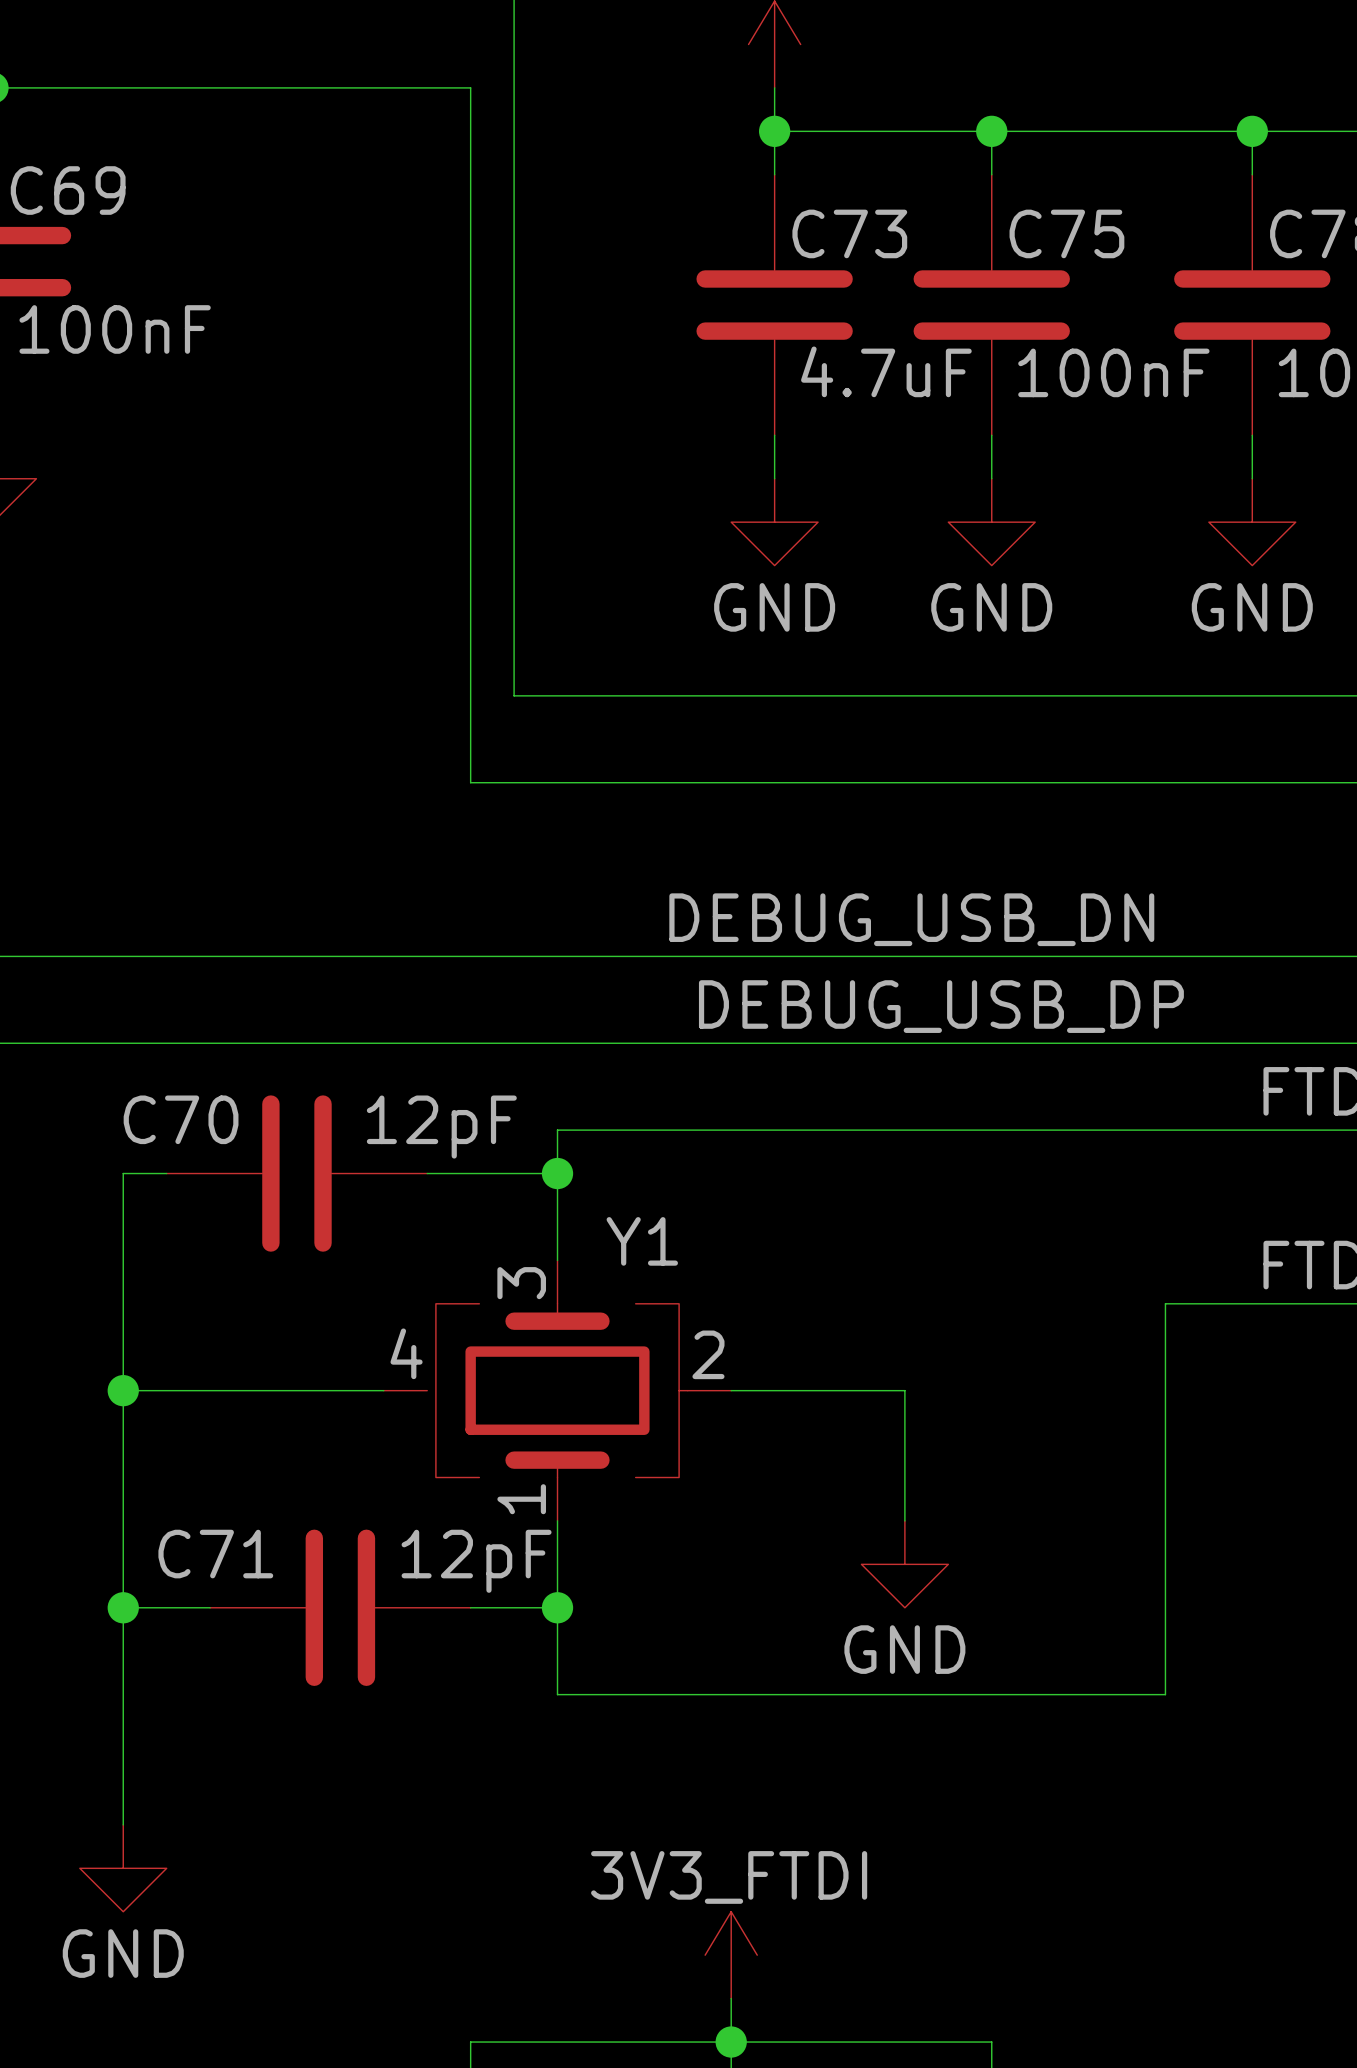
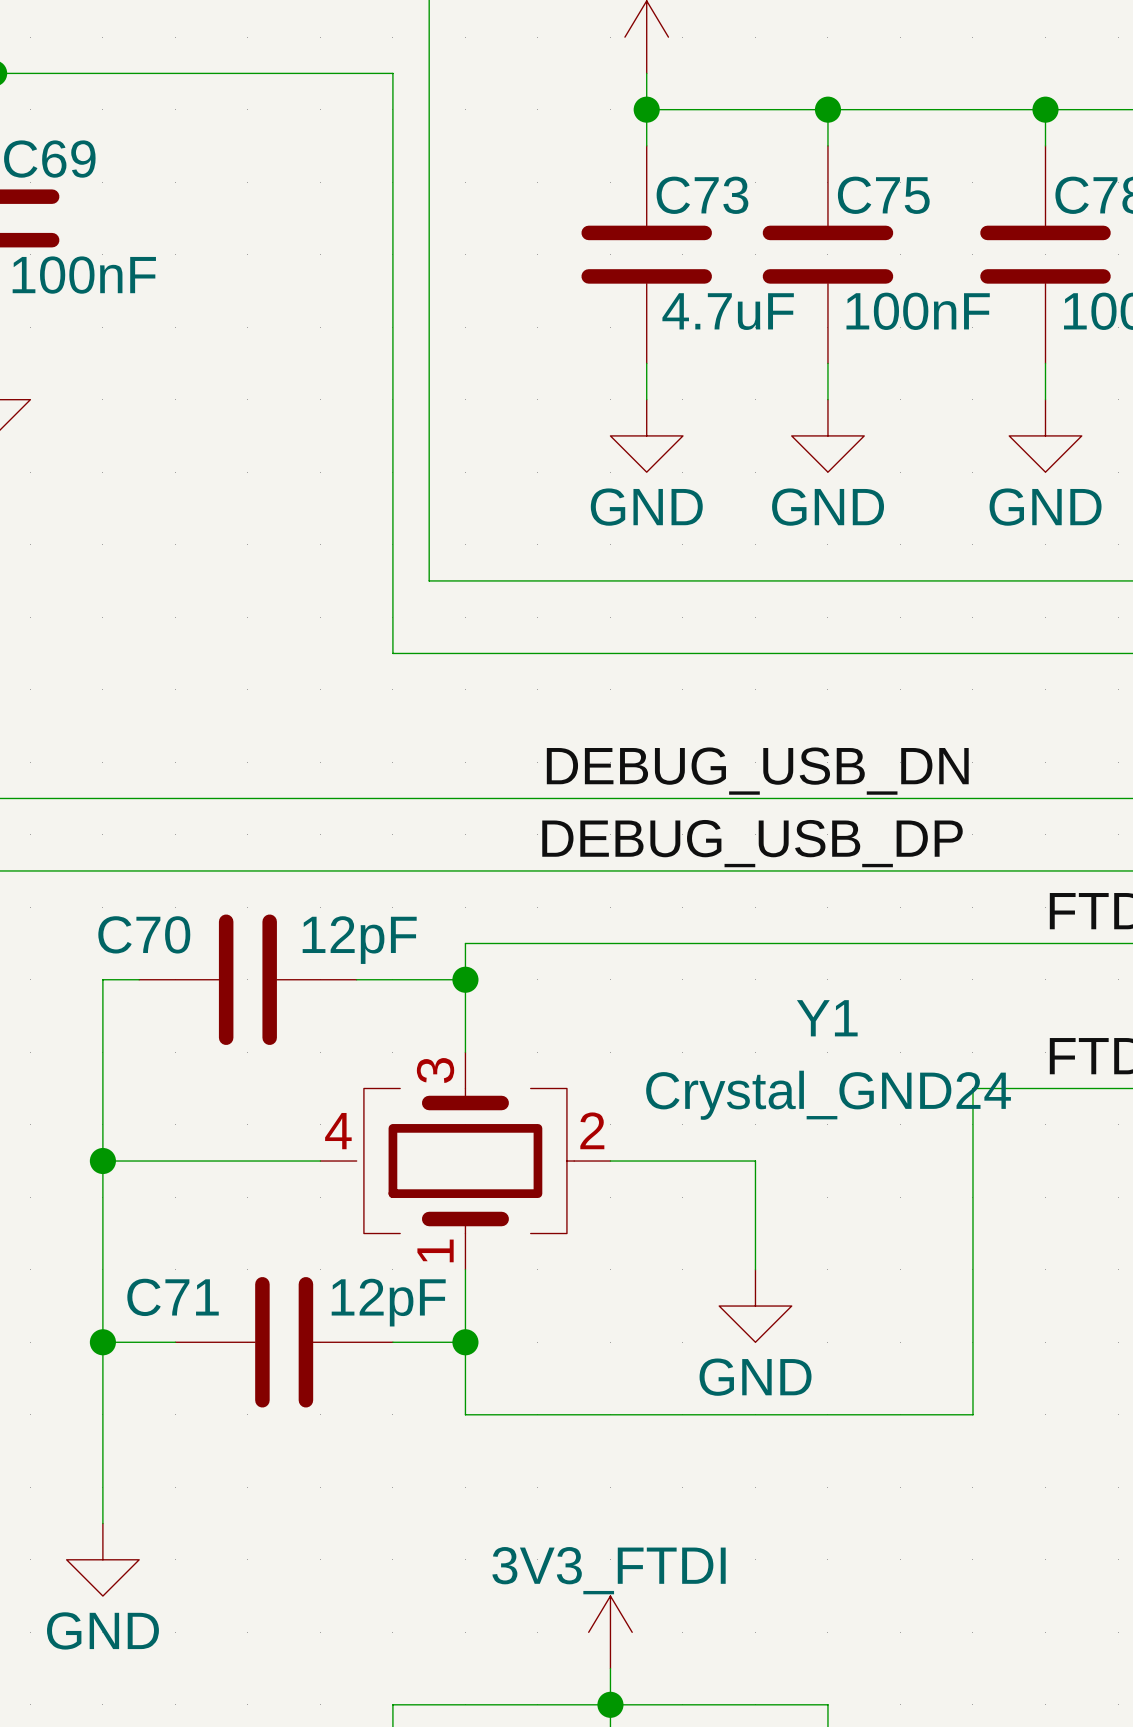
label position: DEBUG_USB_DP (941, 1006) -> DEBUG_USB_DP (752, 843)
Y1 name position: Y1 (642, 1241) -> Y1 (827, 1018)
Y1 value: none -> Crystal_GND24 (828, 1095)

